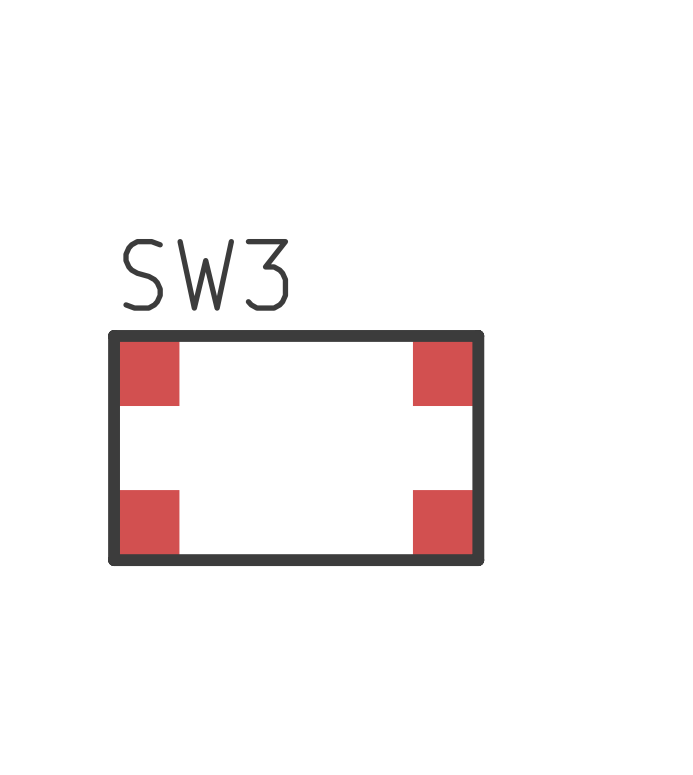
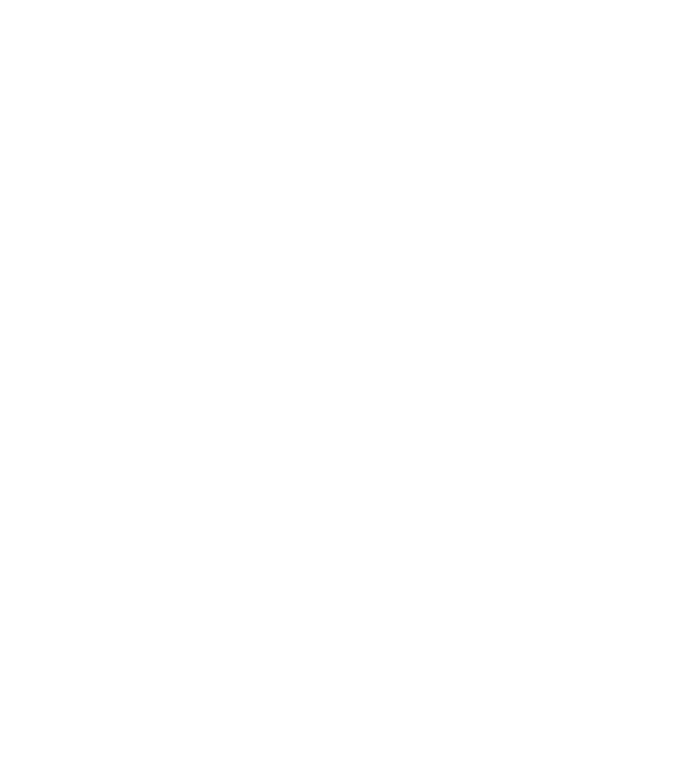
SW3: (296, 448) -> none

